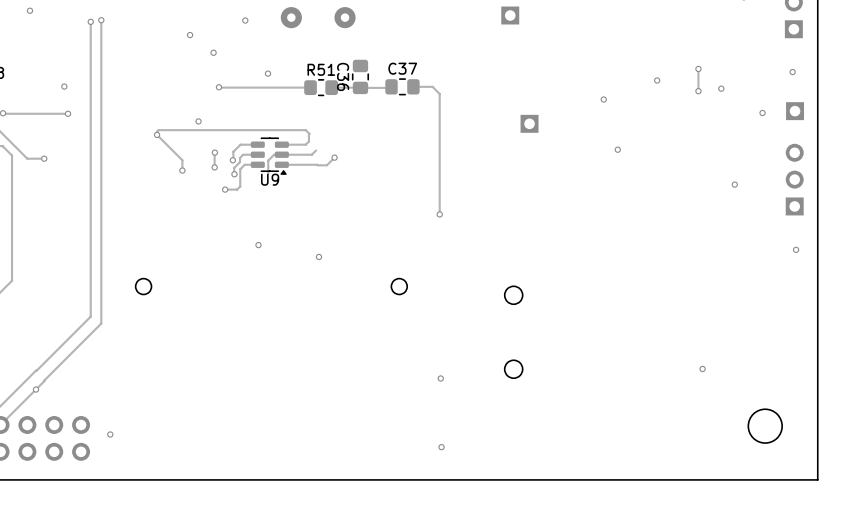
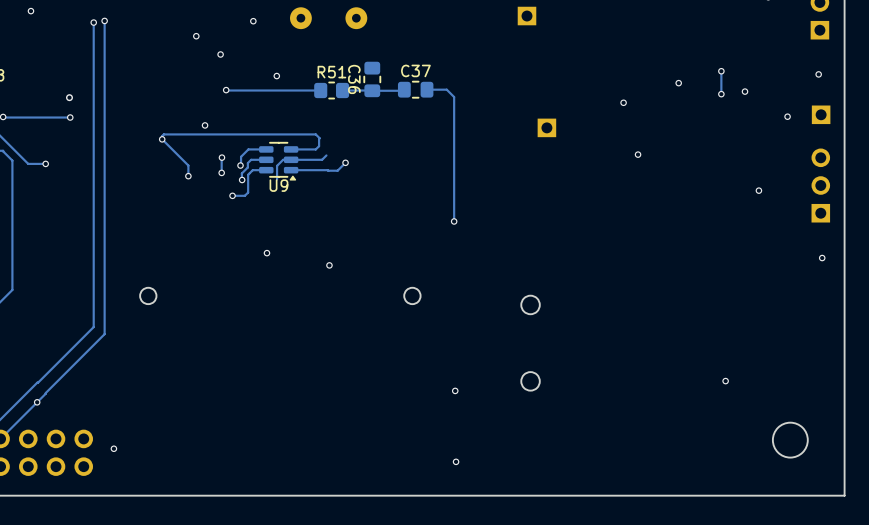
via: (64, 86) -> none
via: none -> (69, 97)

